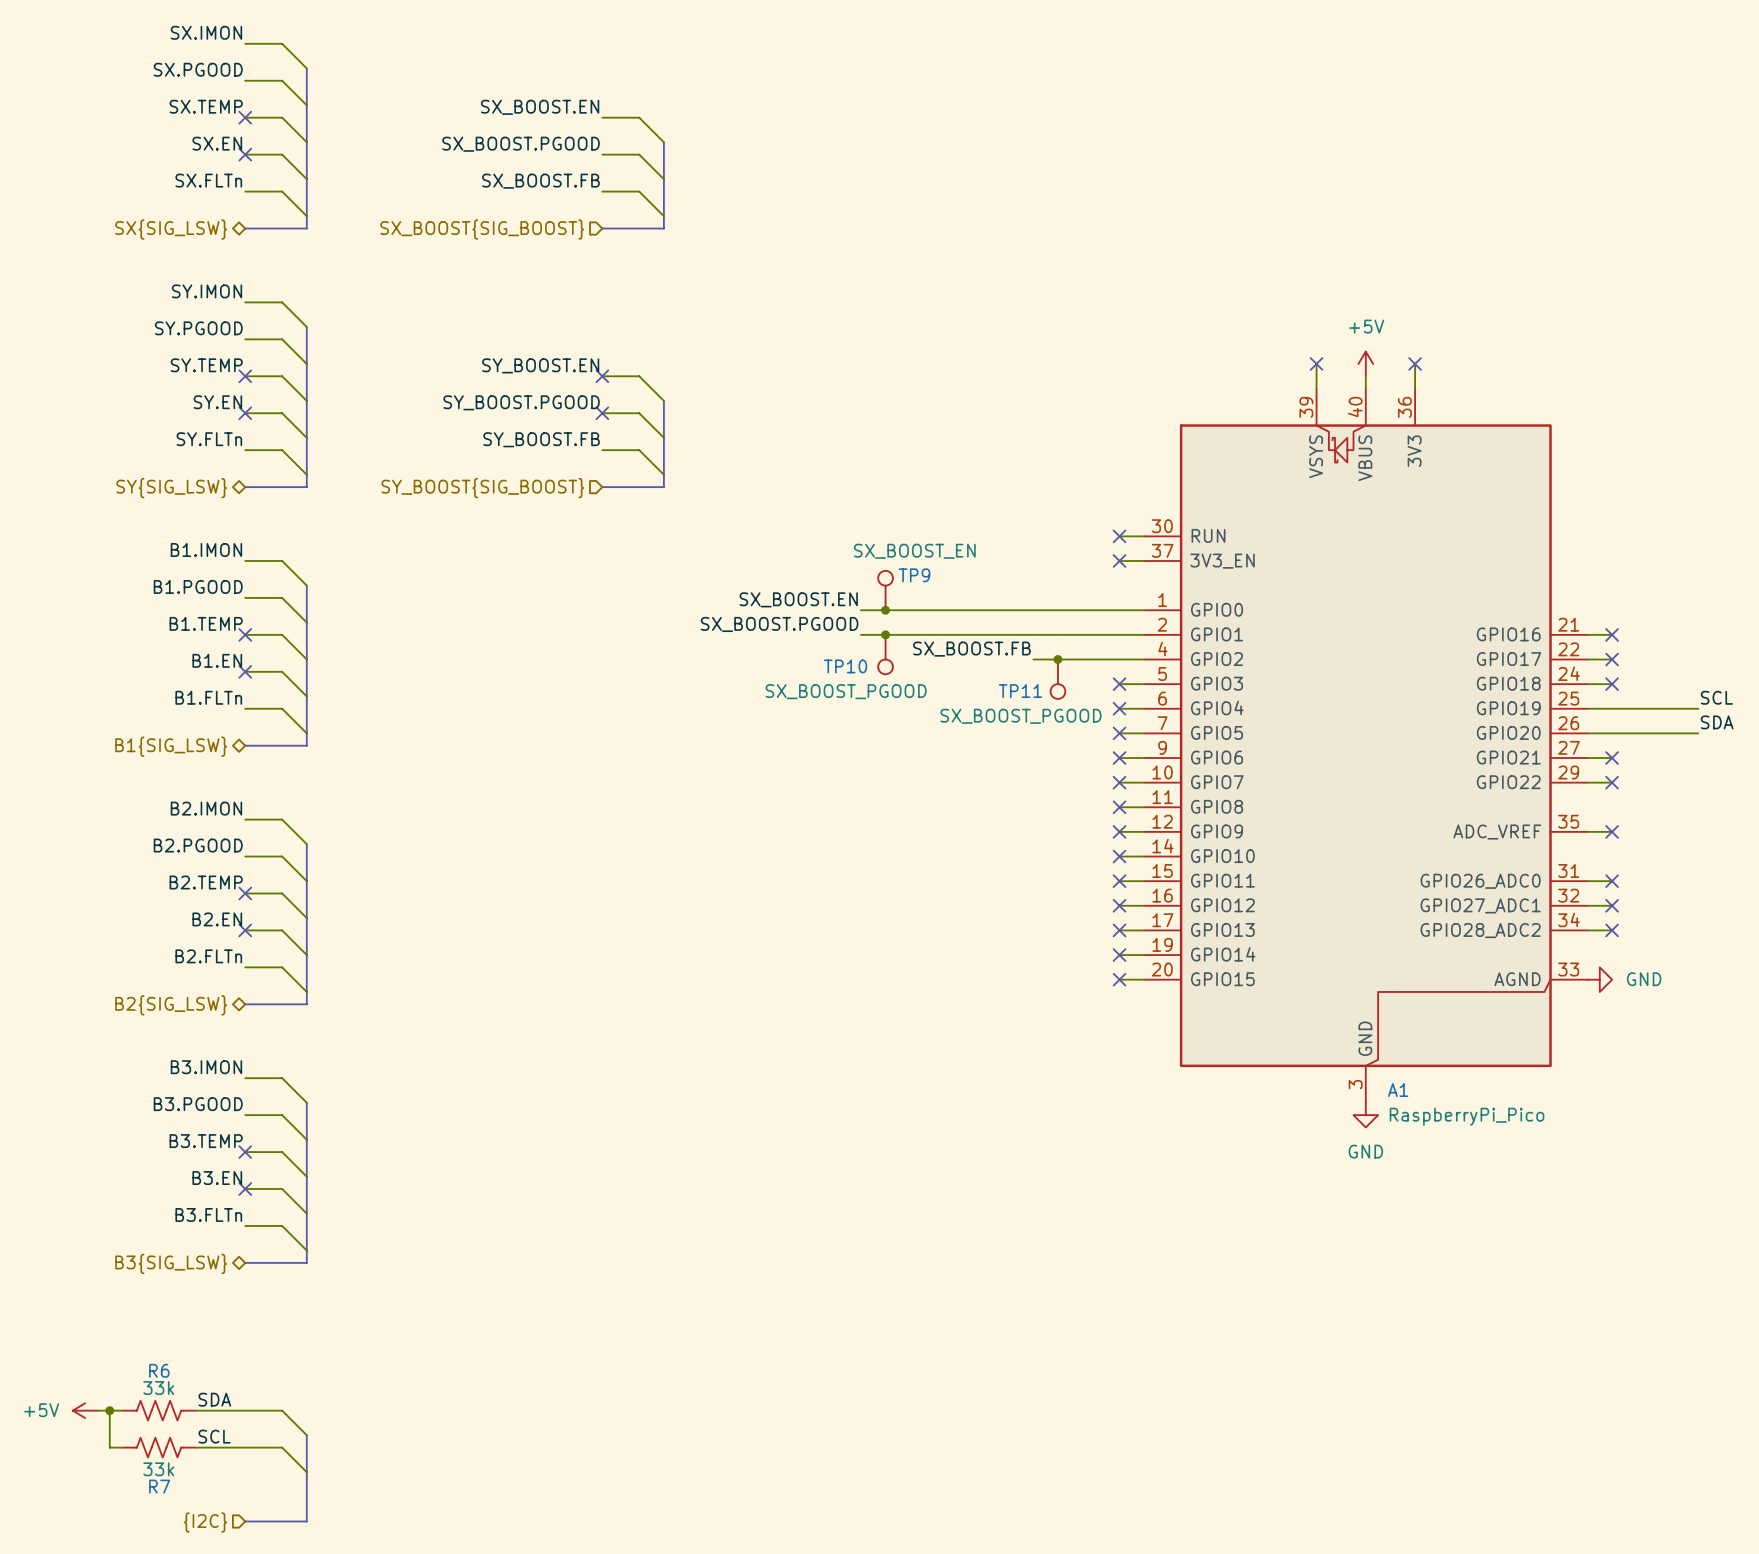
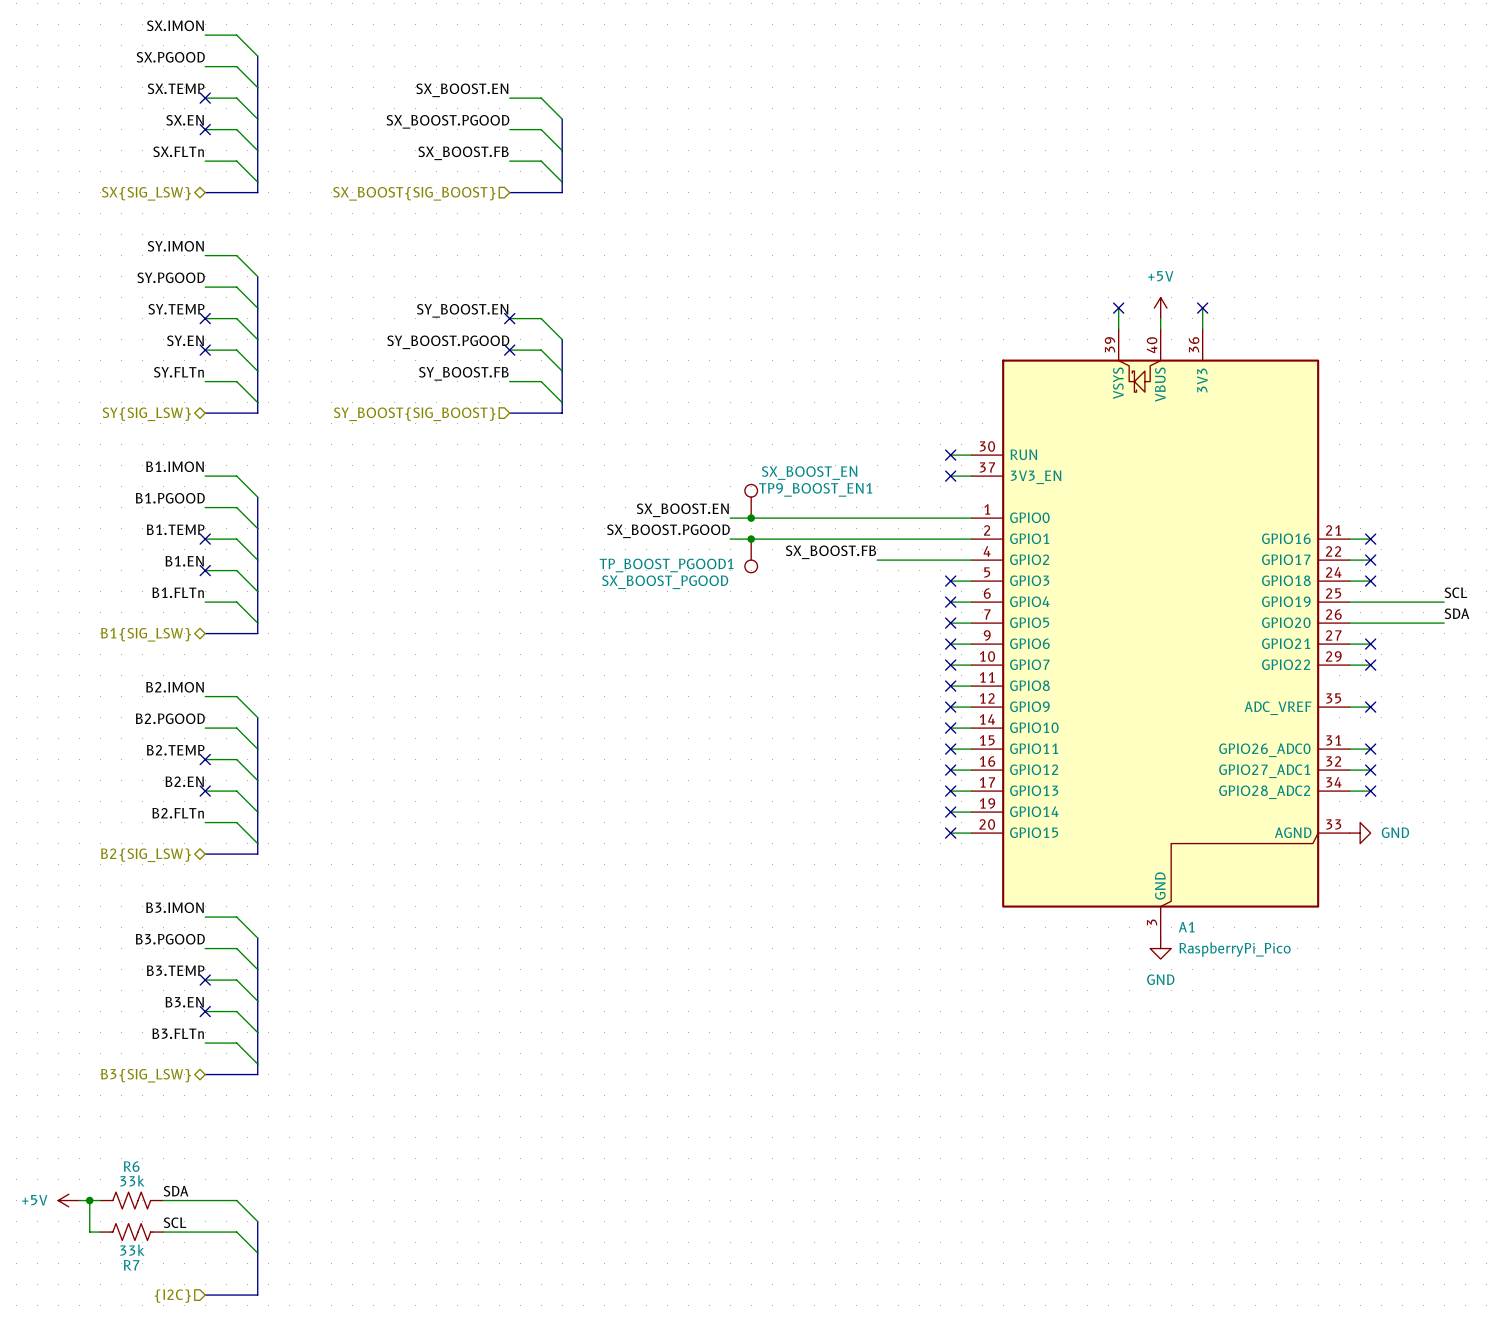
TP9 value position: SX_BOOST_EN (914, 551) -> SX_BOOST_EN (809, 473)
TP9 name: TP9 (914, 575) -> TP9_BOOST_EN1 (815, 489)
junction: (1057, 659) -> none
TP10 name: TP10 (845, 666) -> TP_BOOST_PGOOD1 (666, 565)
TP11: SX_BOOST_PGOOD (1057, 679) -> none
TP10 value position: SX_BOOST_PGOOD (846, 691) -> SX_BOOST_PGOOD (665, 582)

